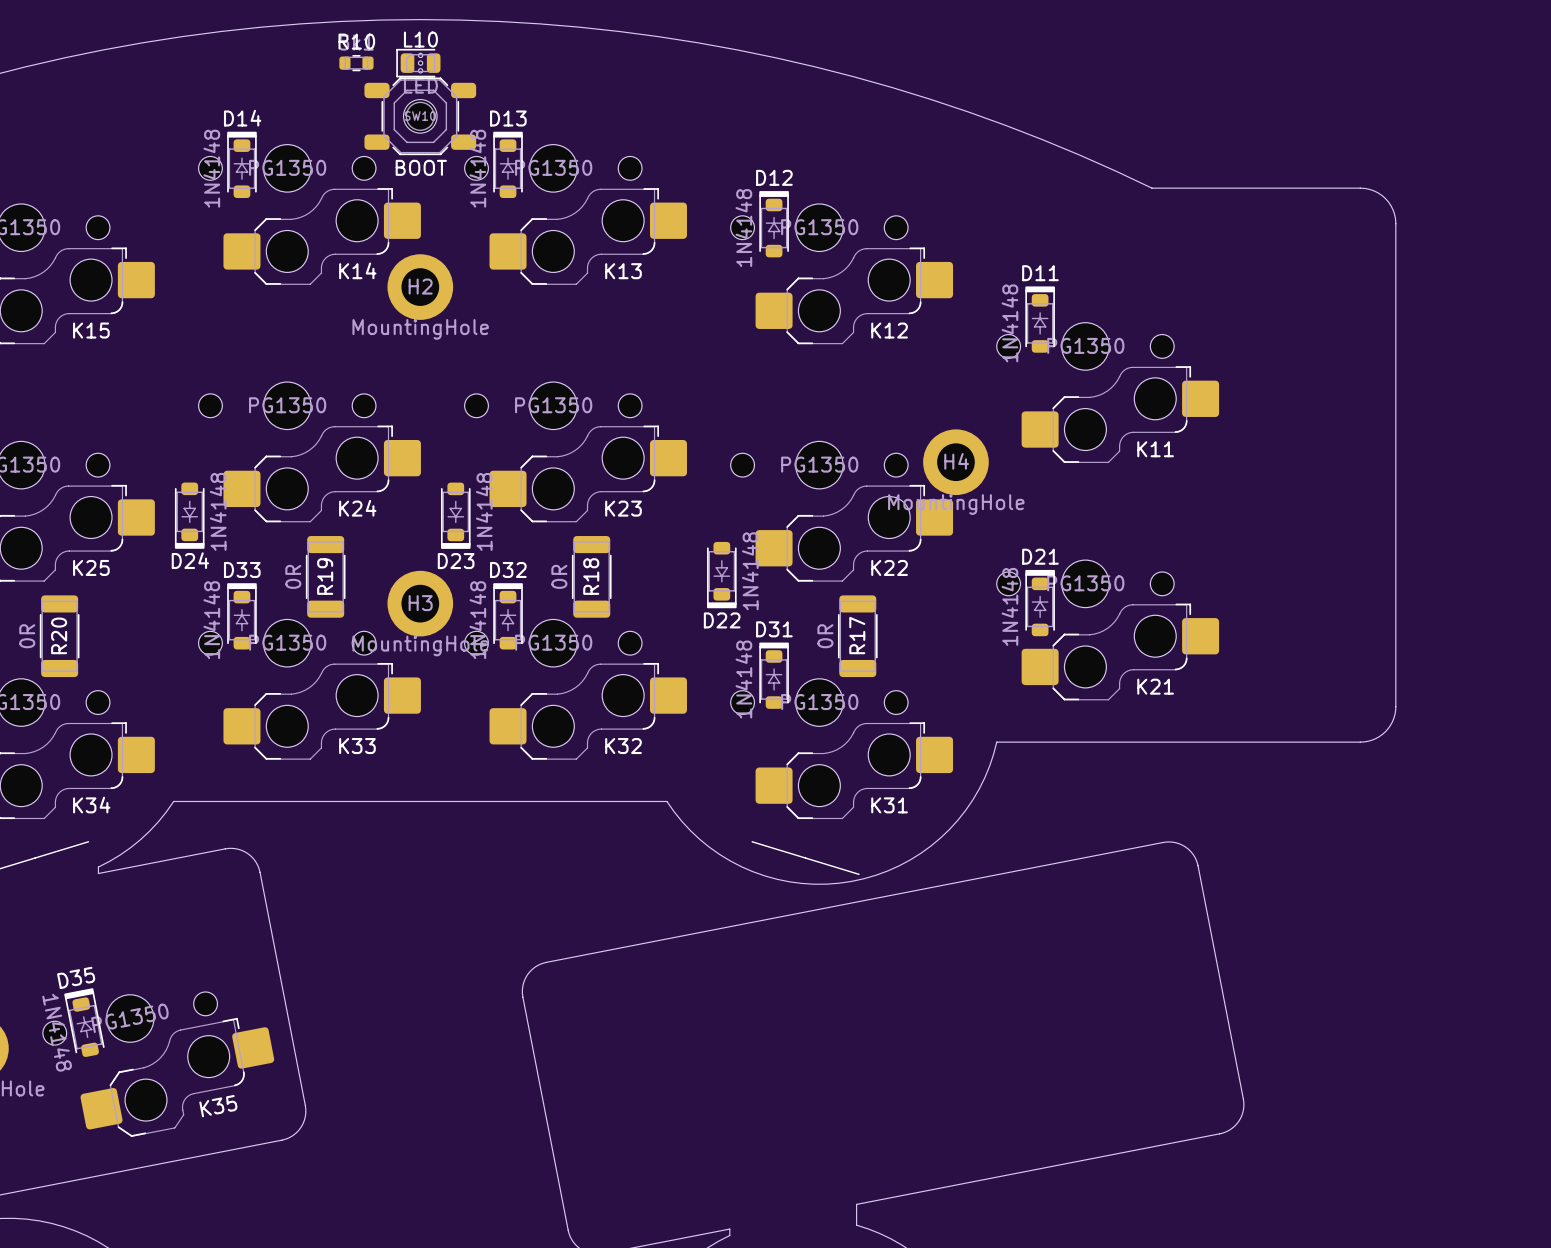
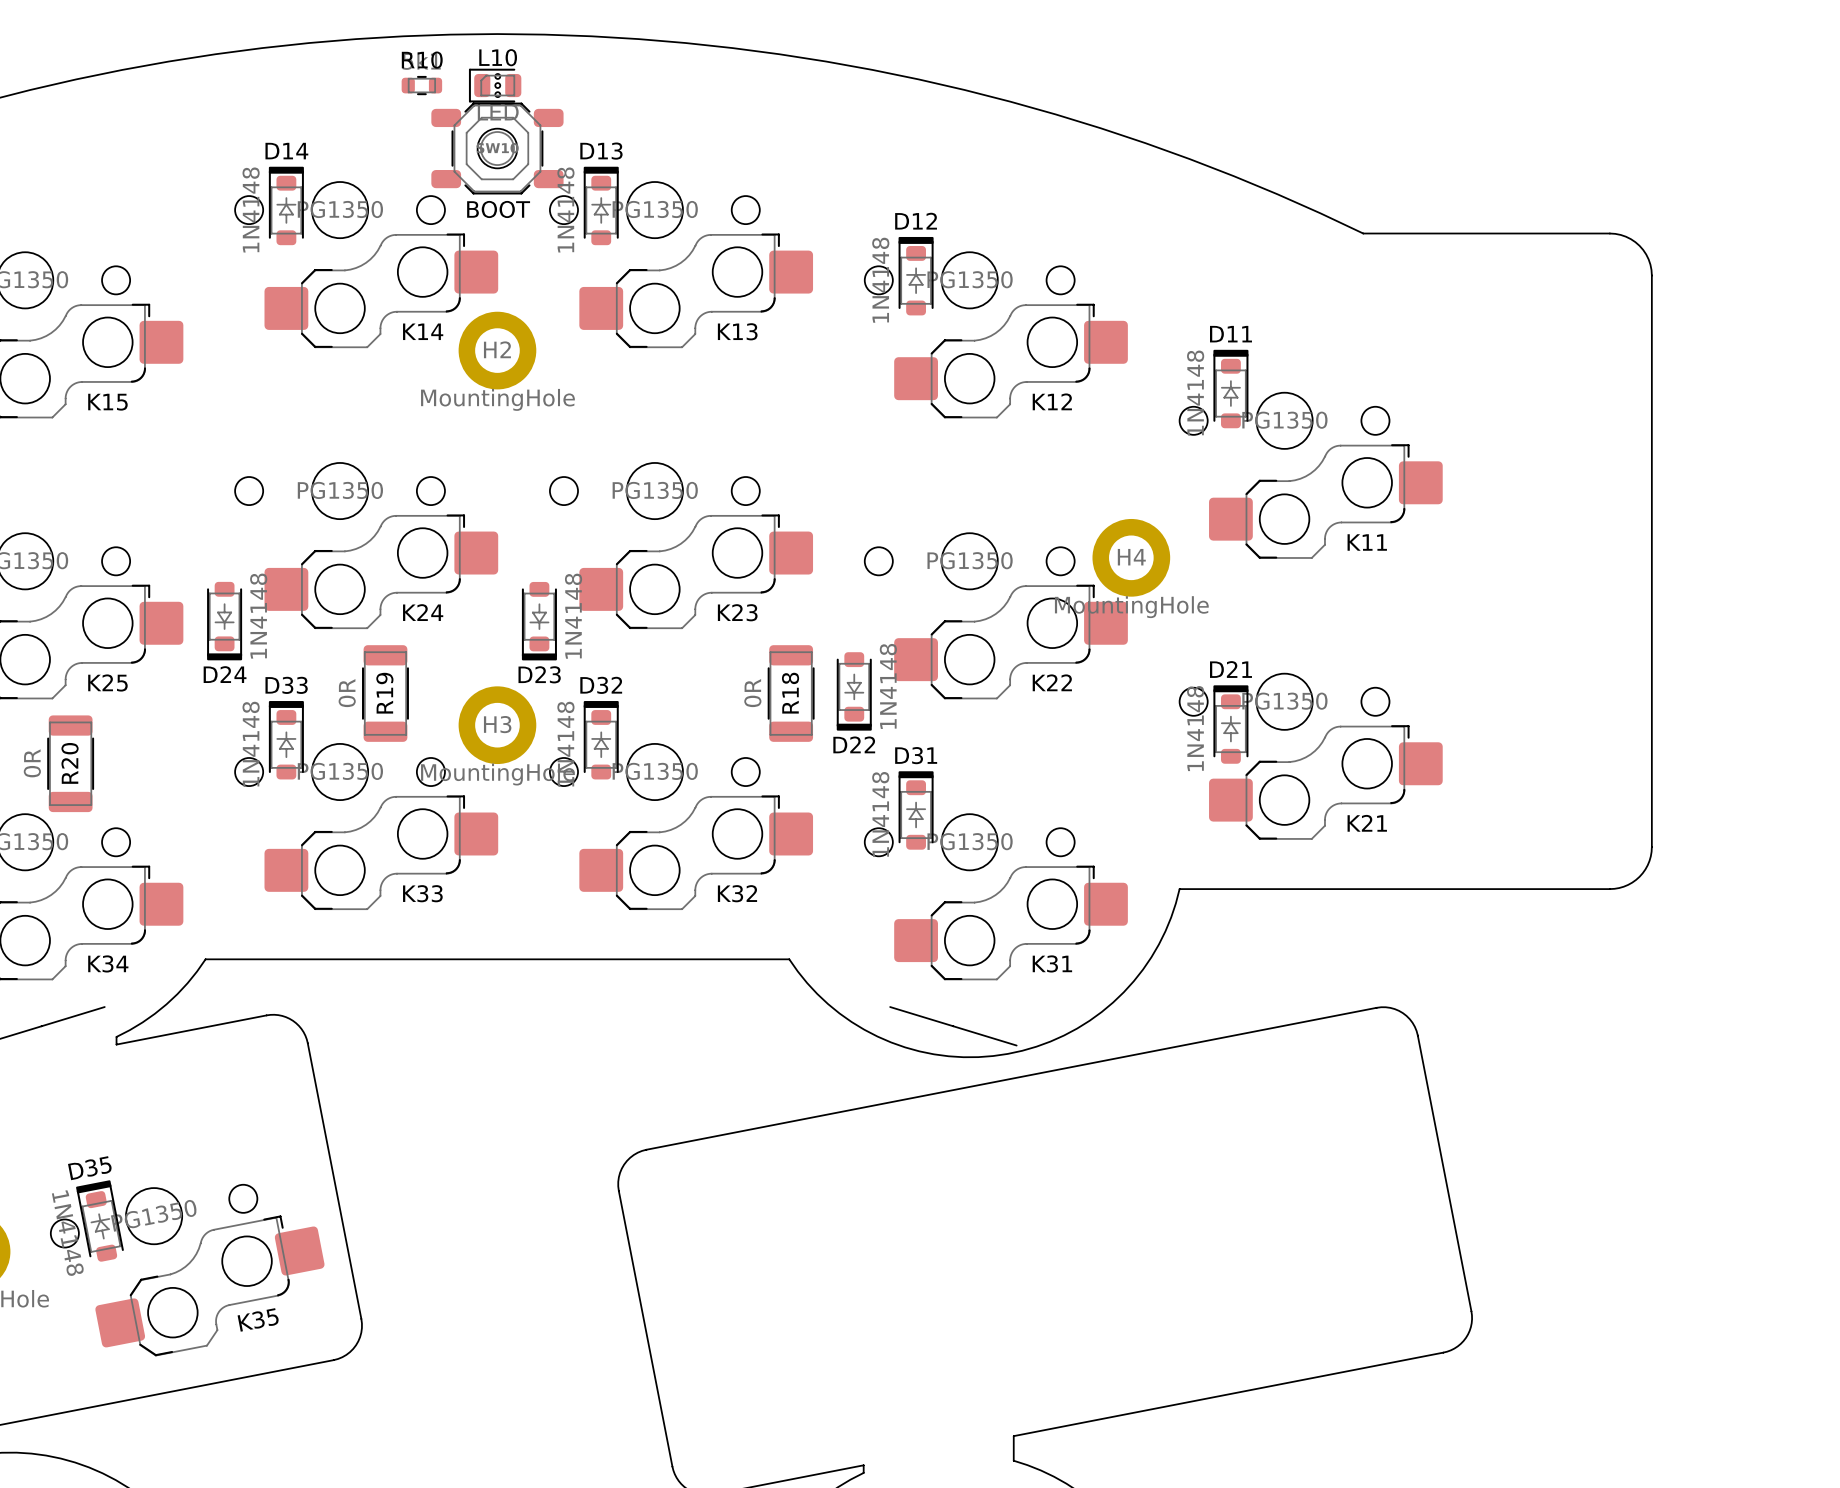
R18 position: (591, 576) -> (791, 693)
R17: 0R (857, 636) -> none

